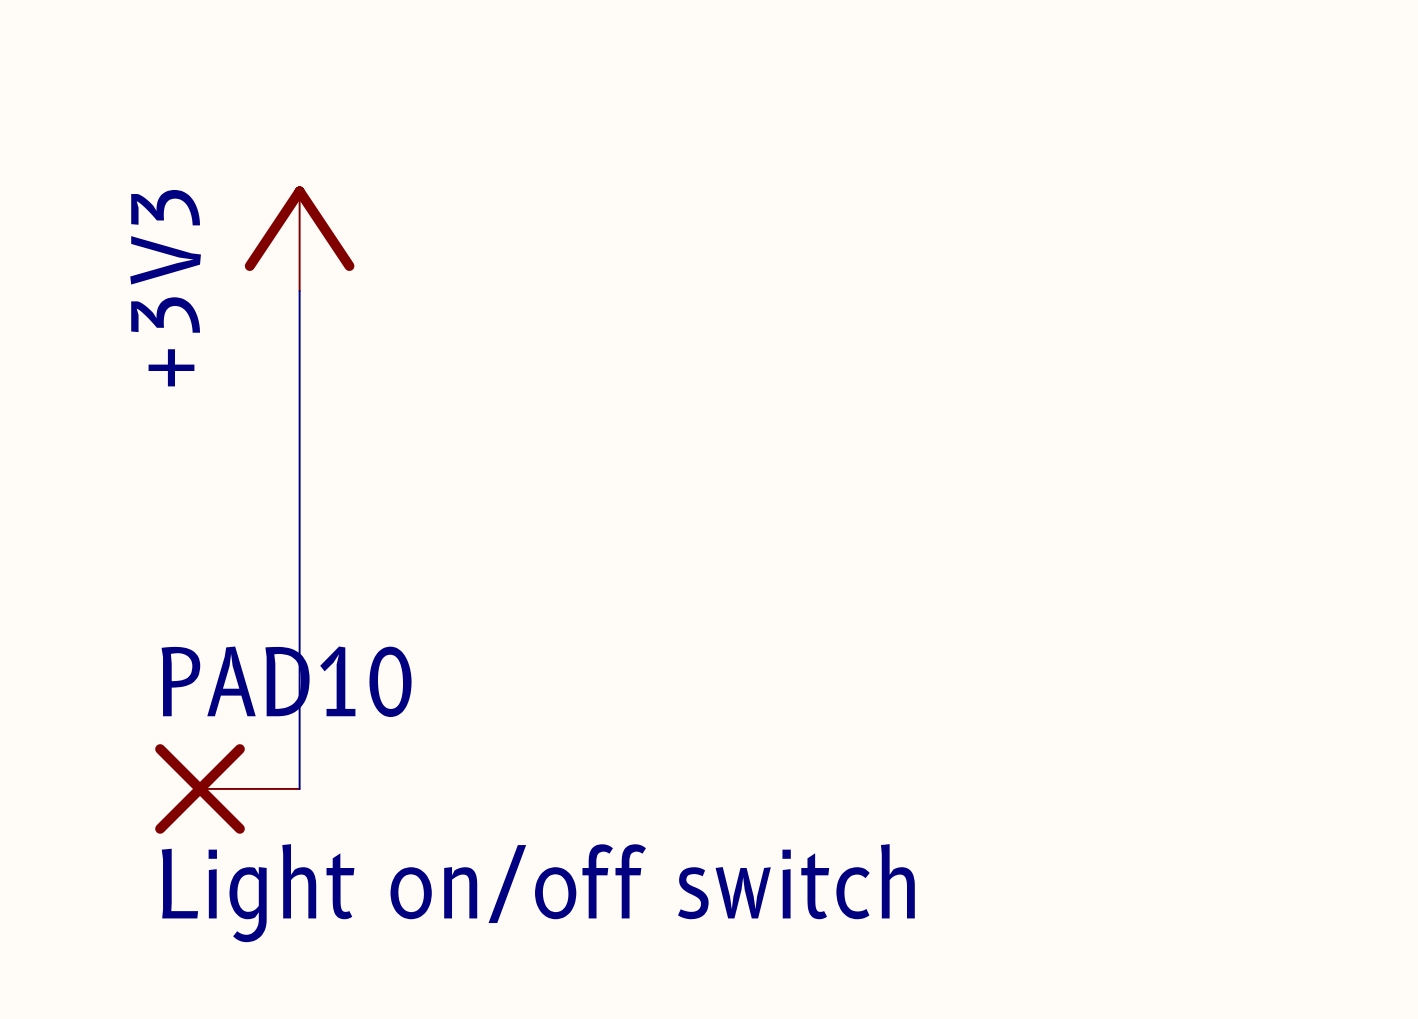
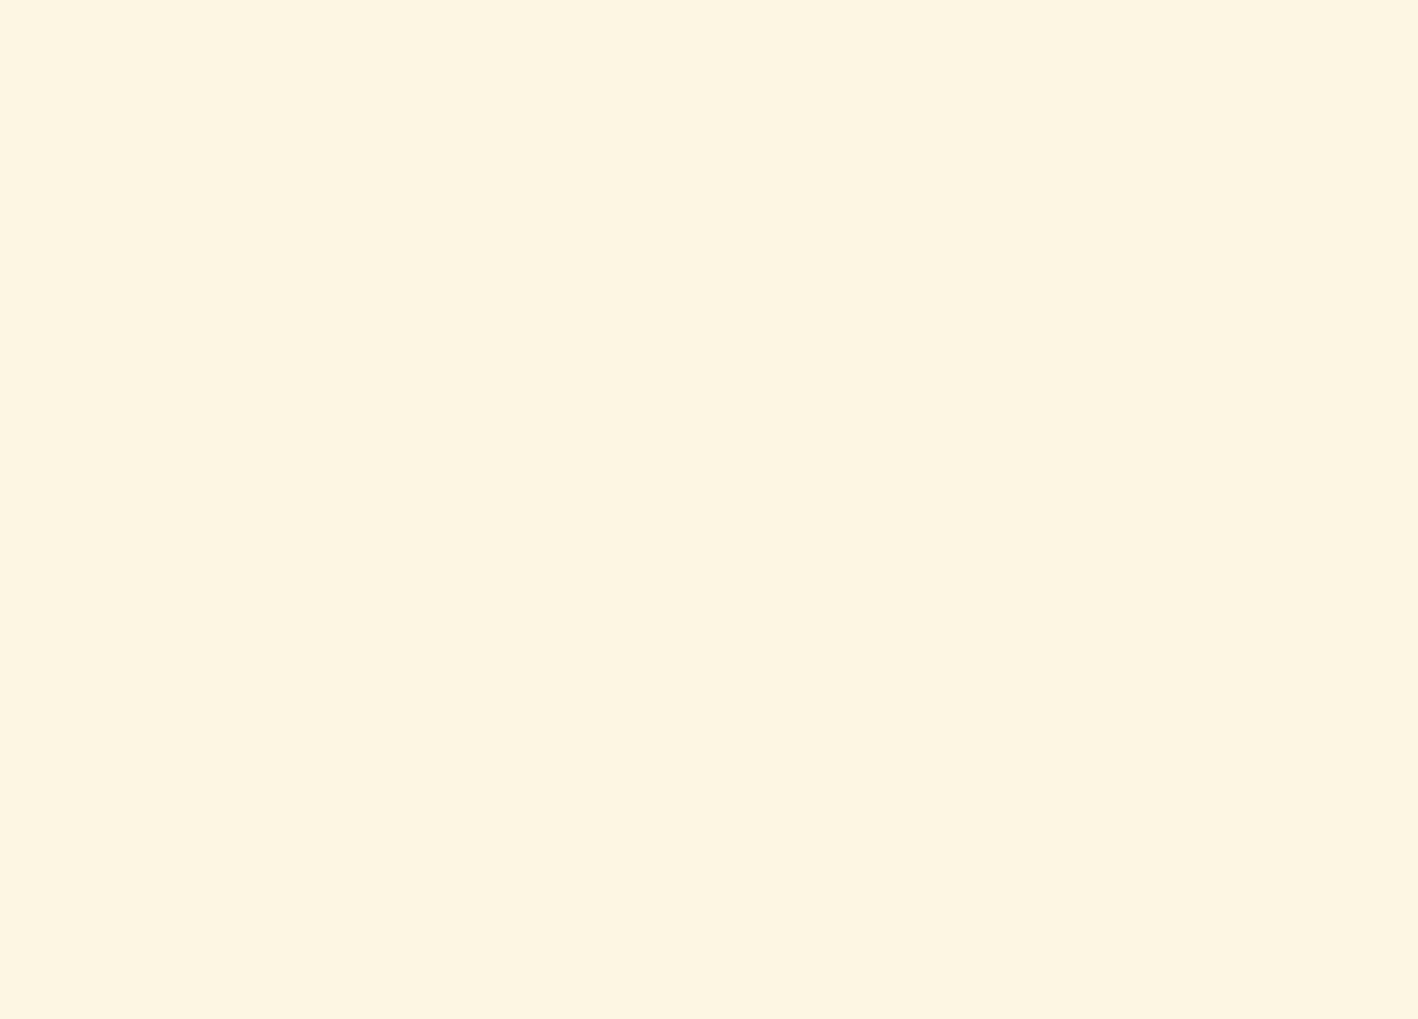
power symbol: +3V3 (299, 238) -> none
wire: (299, 290) (299, 788) -> none
PAD10: Light on/off switch (227, 788) -> none

